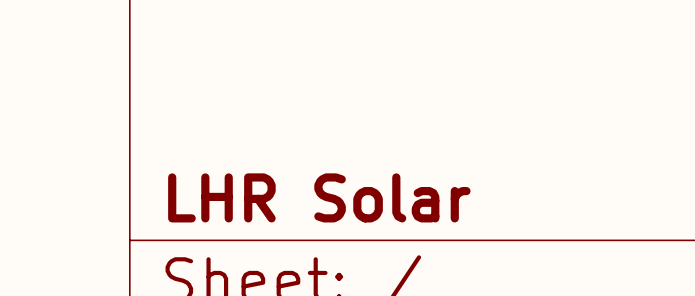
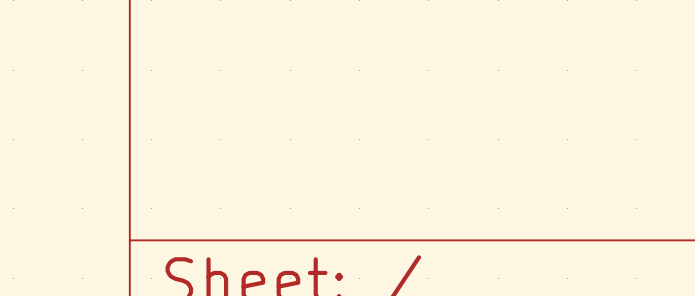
title block: LHR Solar (319, 197) -> none

